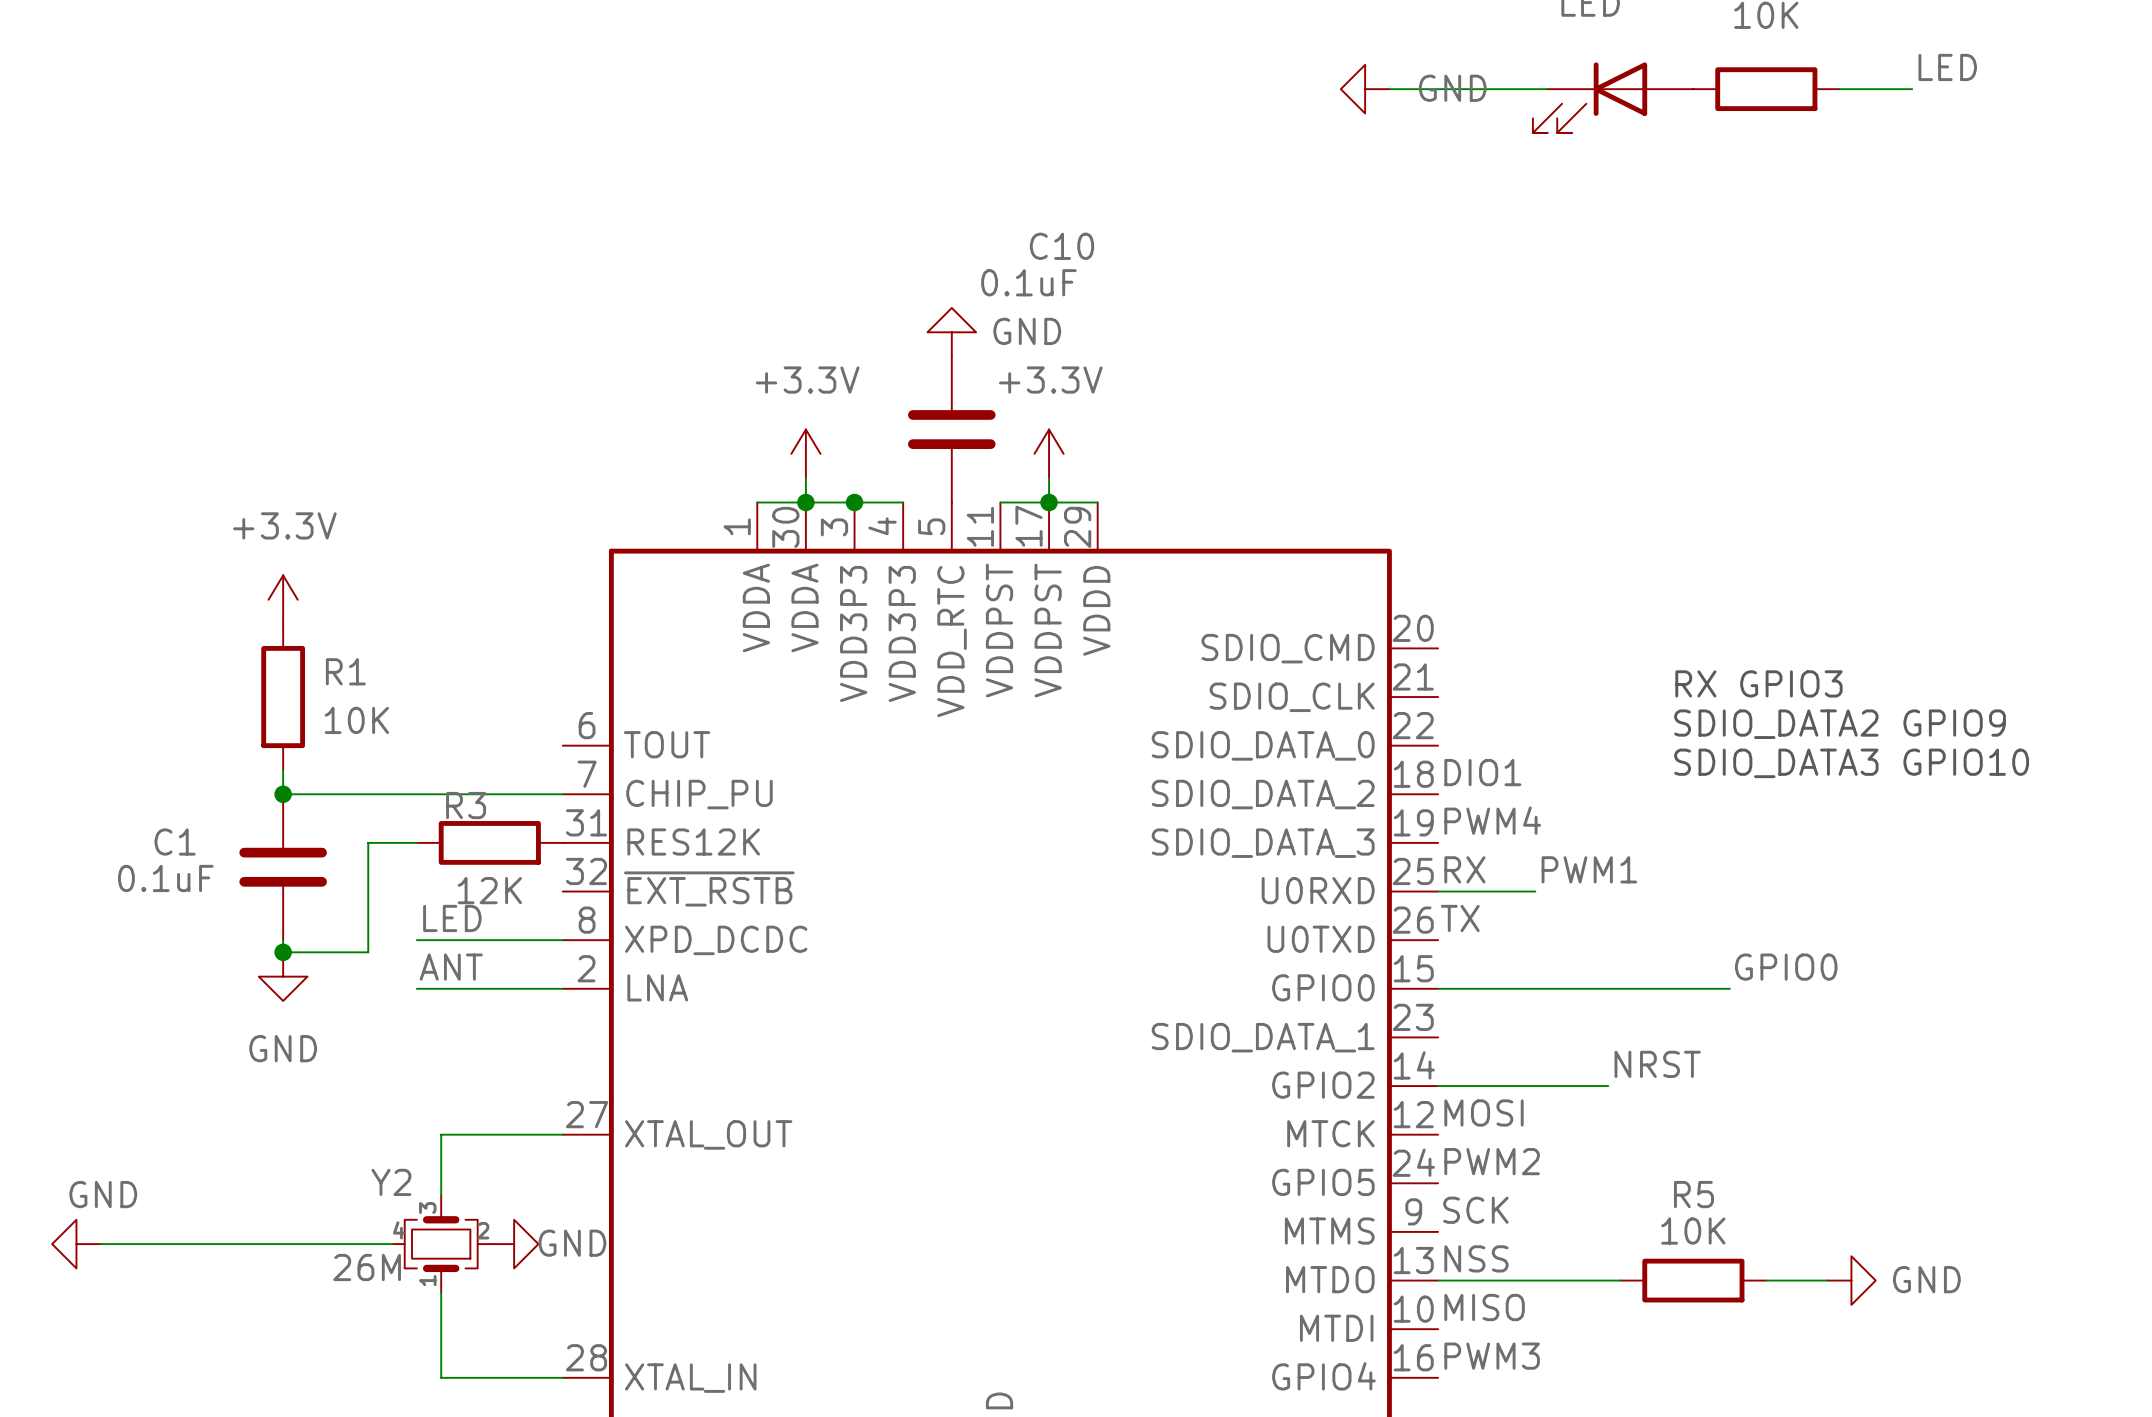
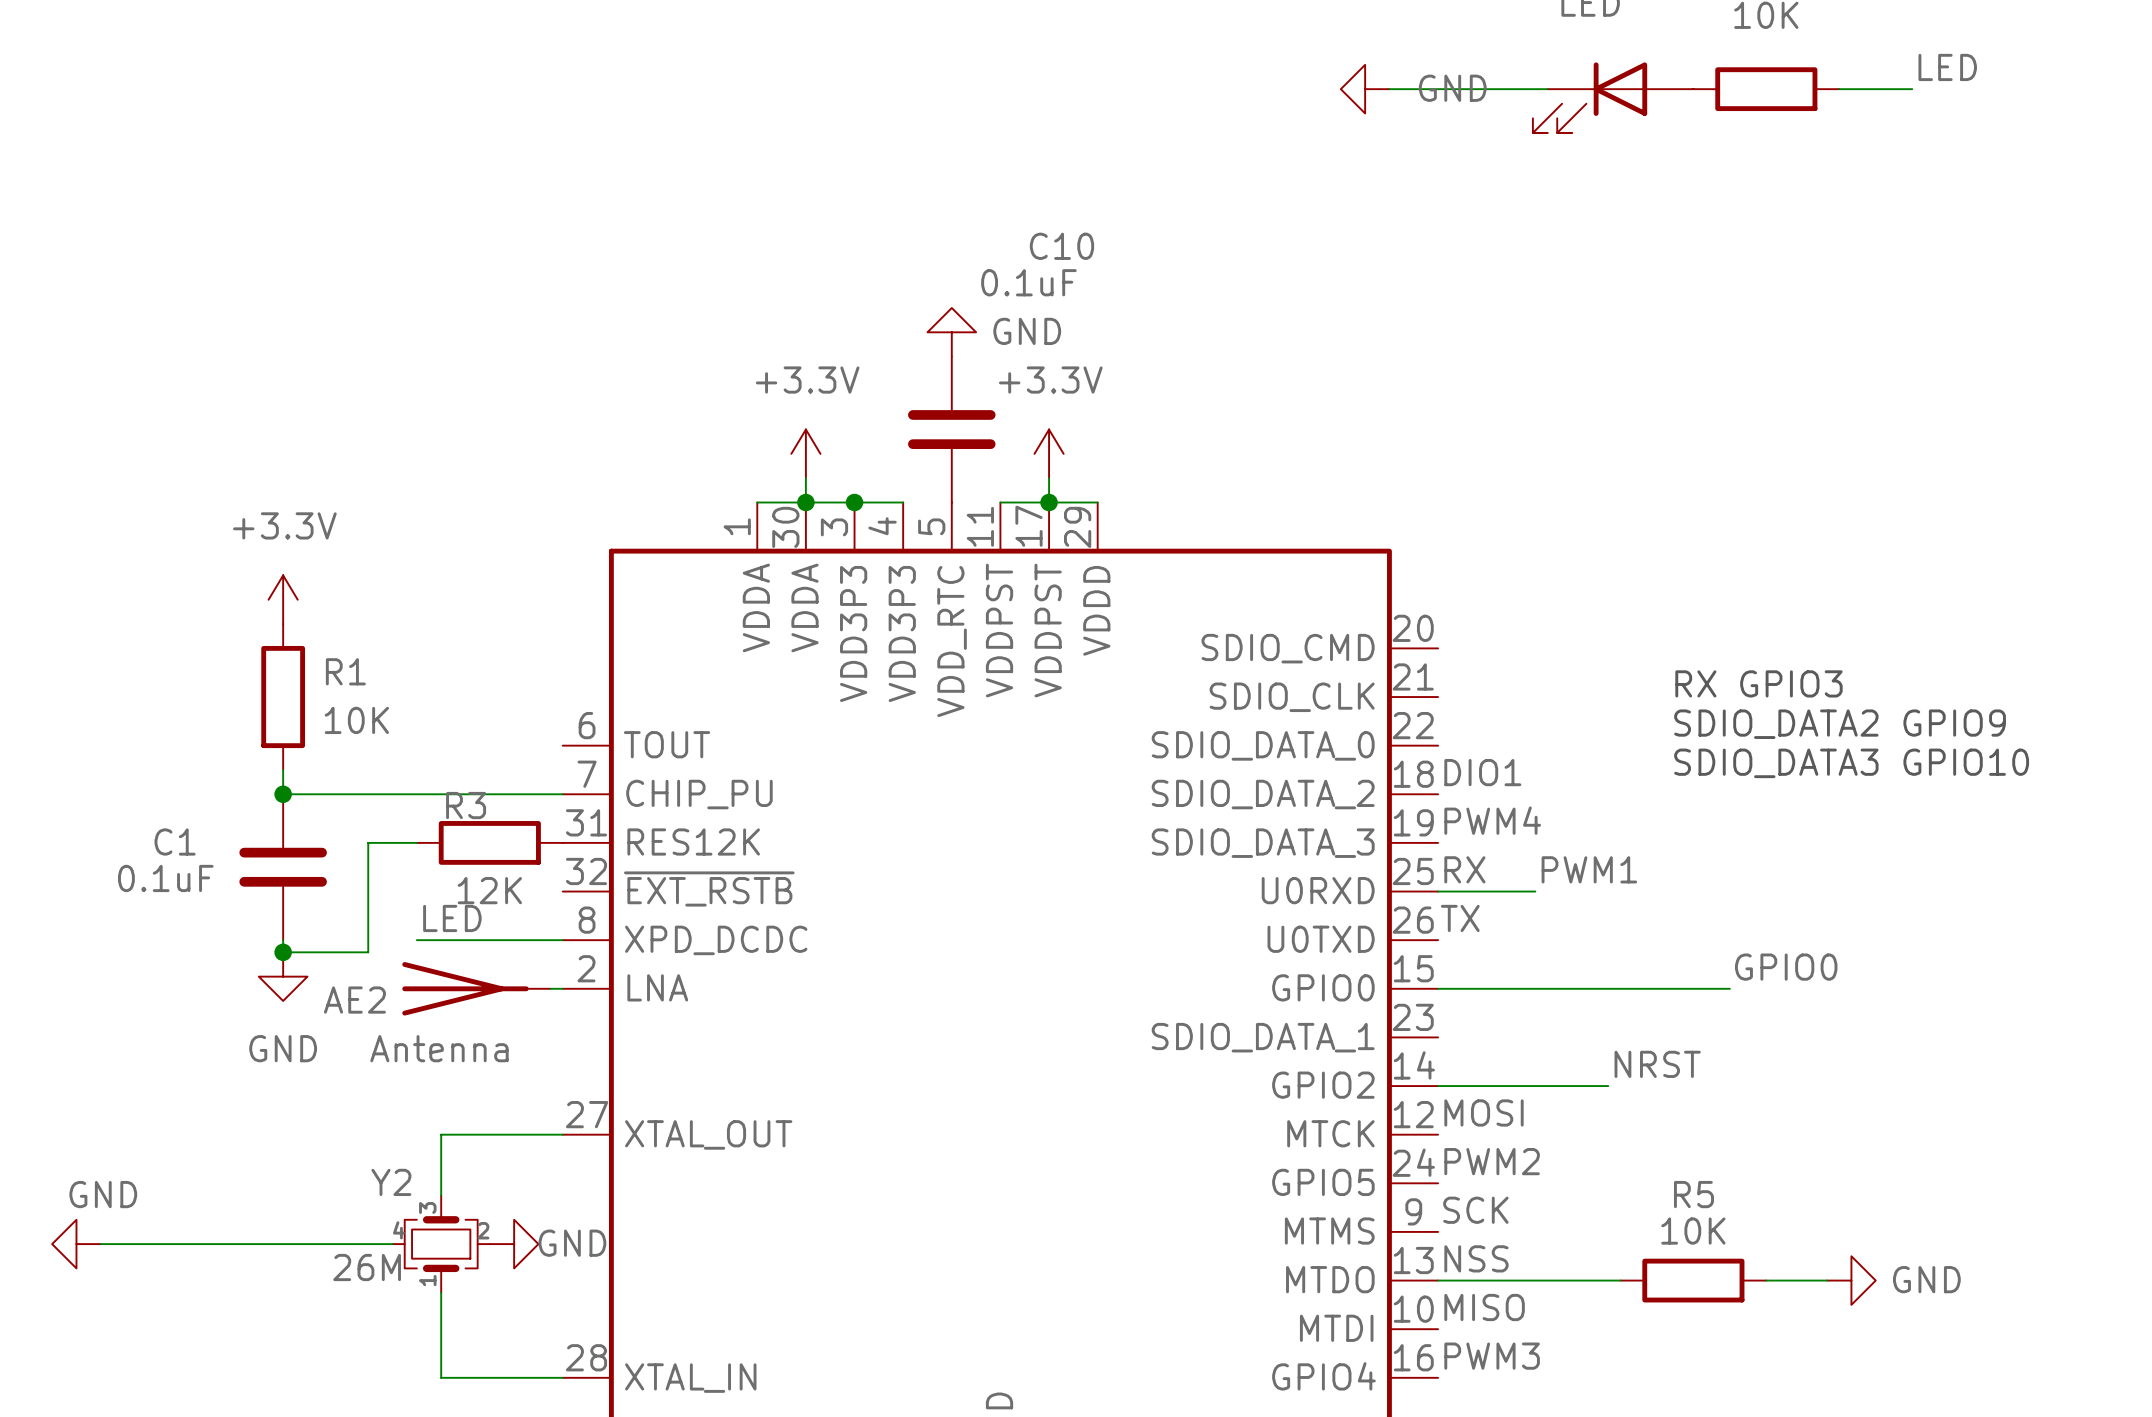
label: ANT (451, 967) -> none
AE2: none -> Antenna (476, 988)

